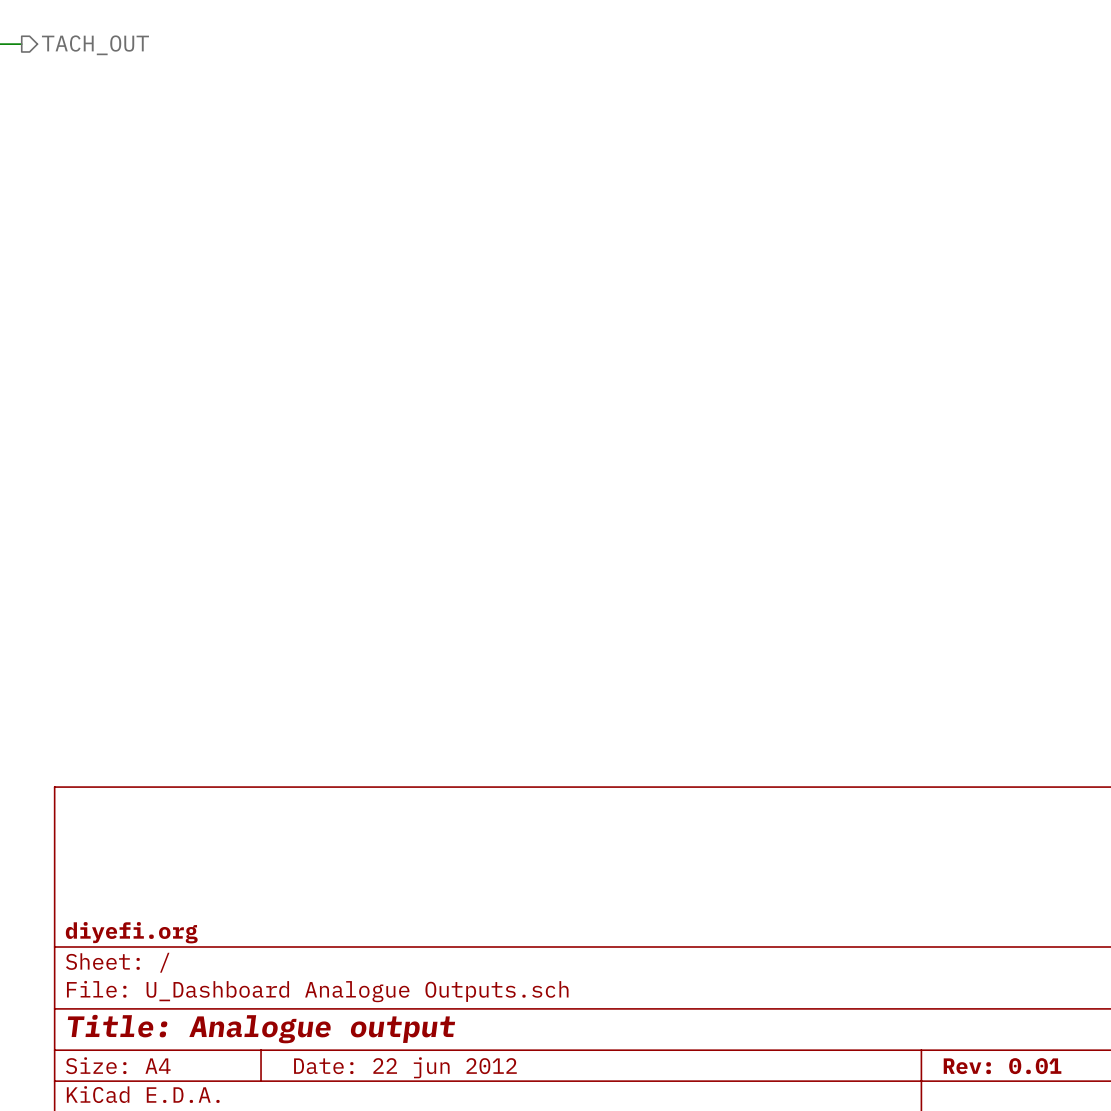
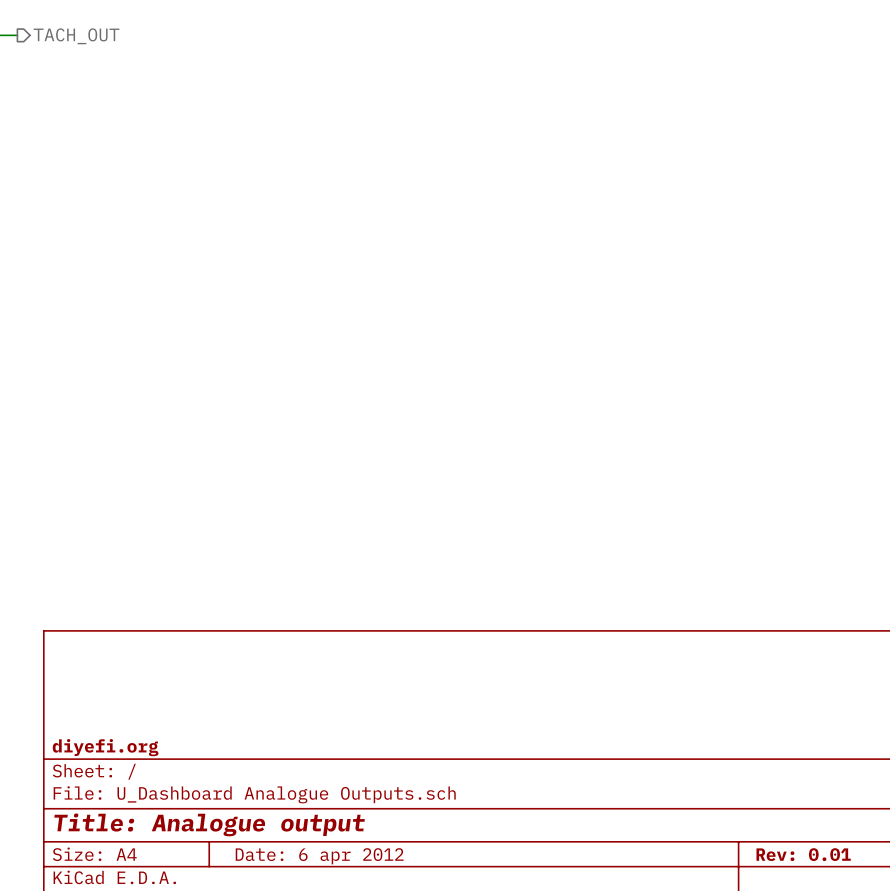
title block: Date: 22 jun 2012 (405, 1067) -> Date: 6 apr 2012 (319, 856)

